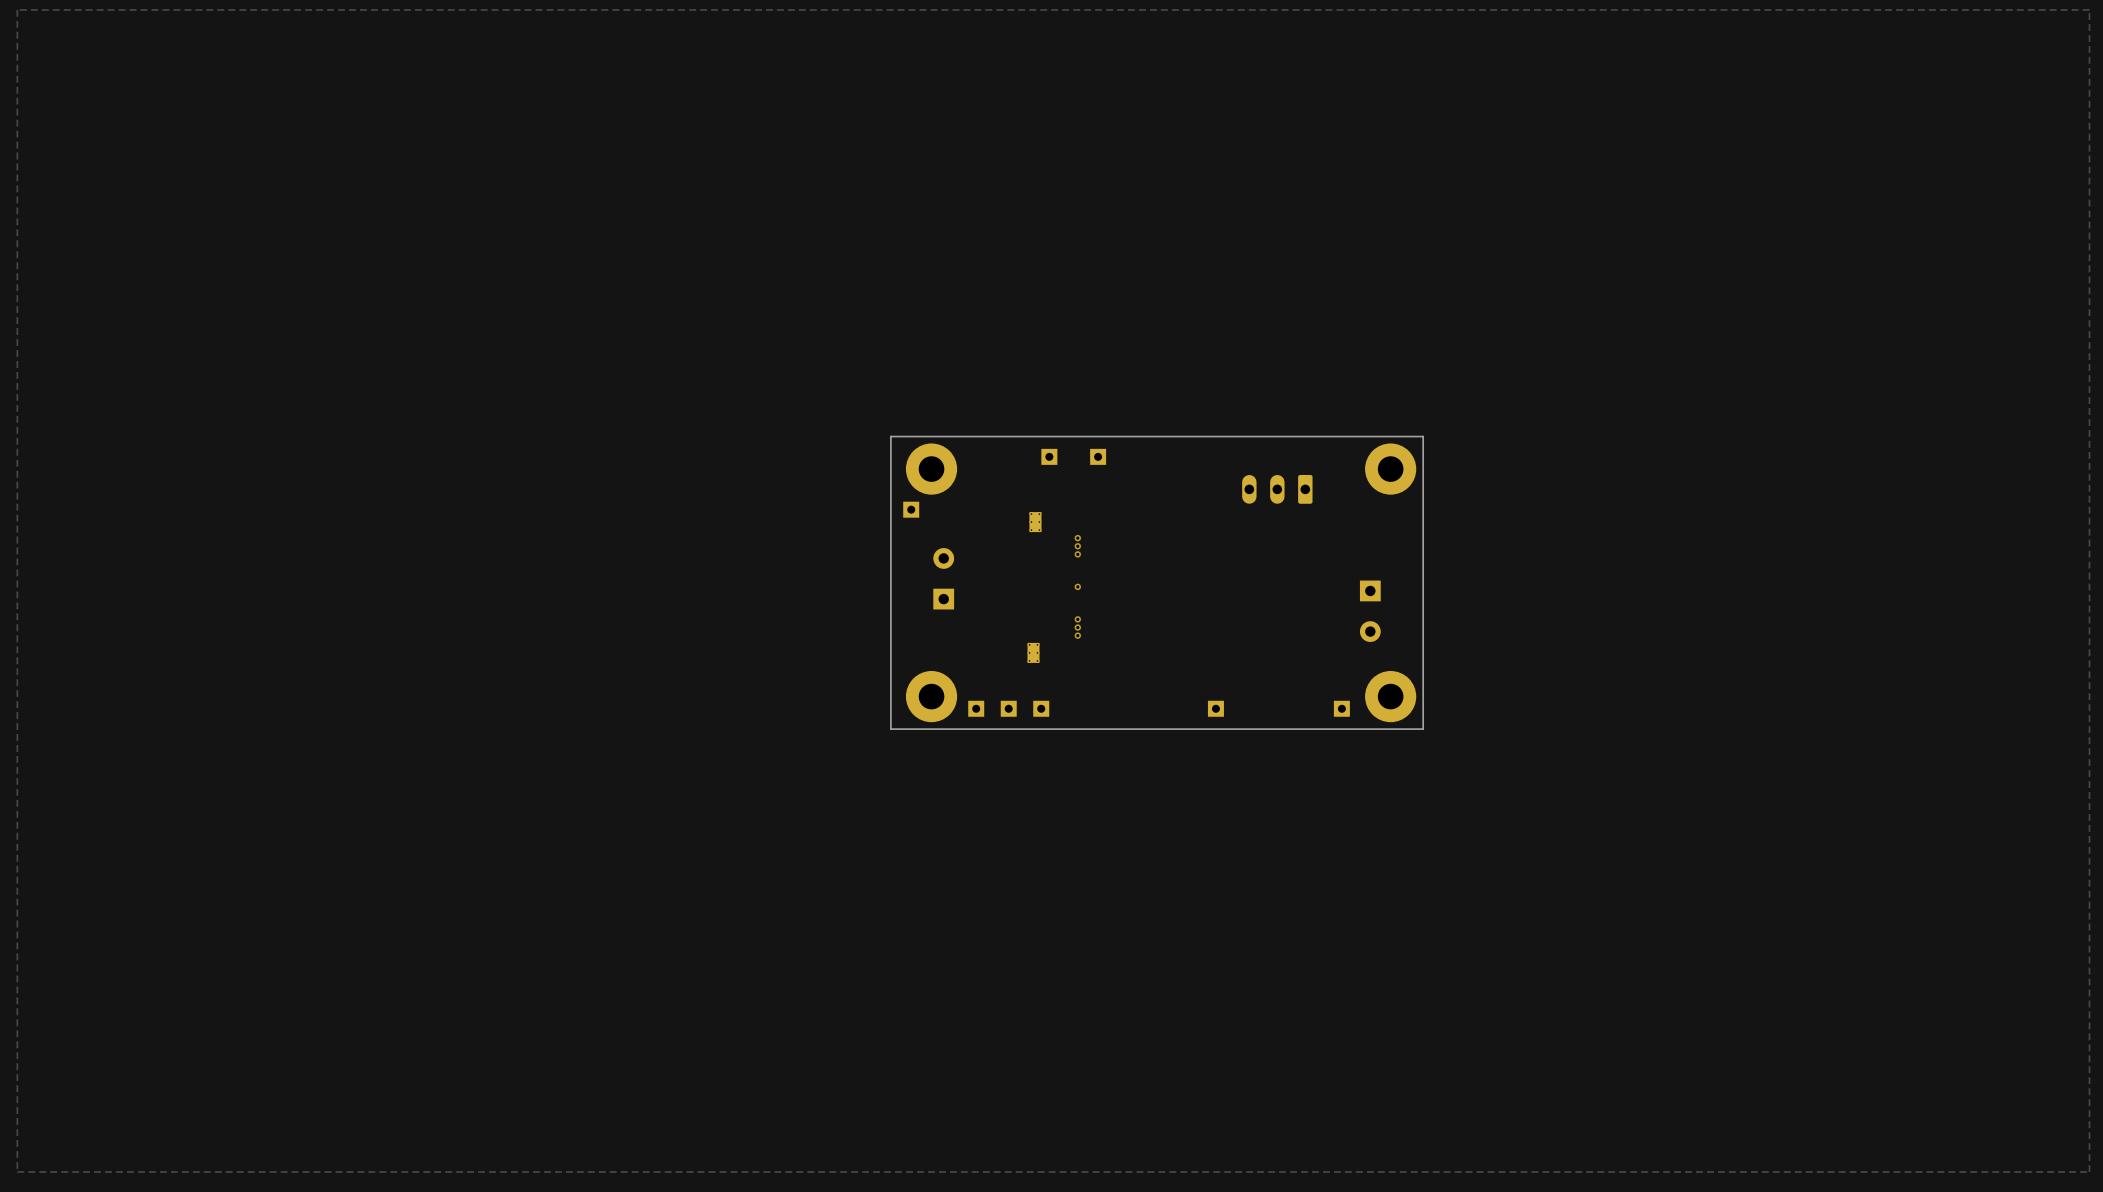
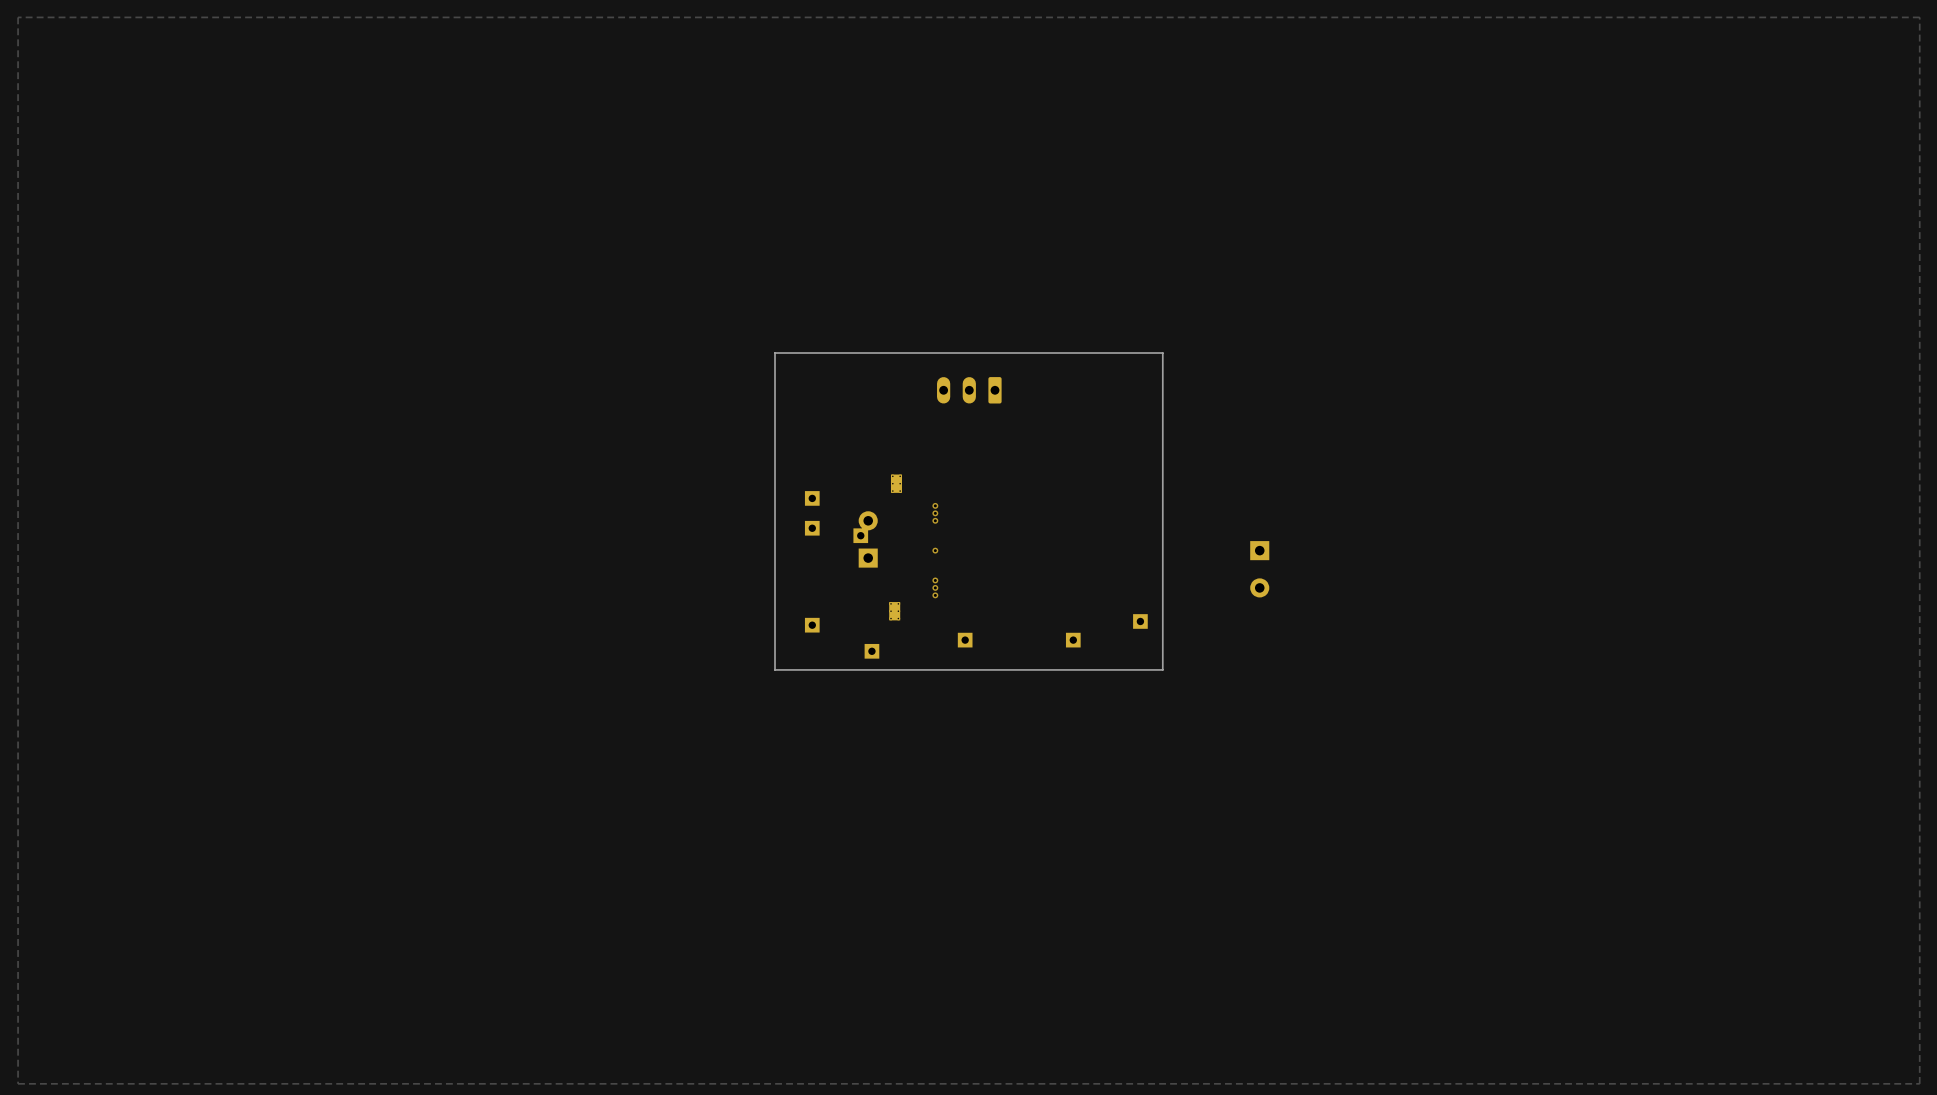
part: none -> (969, 390)
board edge: (1423, 436) (1423, 729) (890, 729) (890, 436) (1423, 436) -> (1162, 353) (1162, 669) (775, 669) (775, 353) (1162, 353)
part: (1049, 456) -> none
part: (1098, 456) -> none
part: (931, 469) -> none
part: (1390, 469) -> none
part: (1277, 489) -> none
part: (911, 509) -> none
part position: (1035, 522) -> (896, 483)
part: none -> (812, 498)
via: (1077, 538) -> none
via: none -> (935, 505)
via: (1077, 546) -> none
via: none -> (935, 513)
via: (1077, 554) -> none
via: none -> (935, 520)
part: none -> (812, 528)
part: none -> (860, 535)
via: (1077, 586) -> none
via: none -> (935, 550)
via: (1077, 619) -> none
via: none -> (935, 580)
via: (1077, 627) -> none
via: none -> (935, 587)
via: (1077, 635) -> none
via: none -> (935, 595)
part position: (1033, 652) -> (894, 611)
part: none -> (1140, 621)
part: none -> (812, 625)
part: none -> (1073, 640)
part: (931, 696) -> none
part: (1390, 696) -> none
part position: (976, 708) -> (871, 651)
part: (1008, 708) -> none
part position: (1041, 708) -> (965, 640)
part: (1215, 708) -> none
part: (1341, 708) -> none

